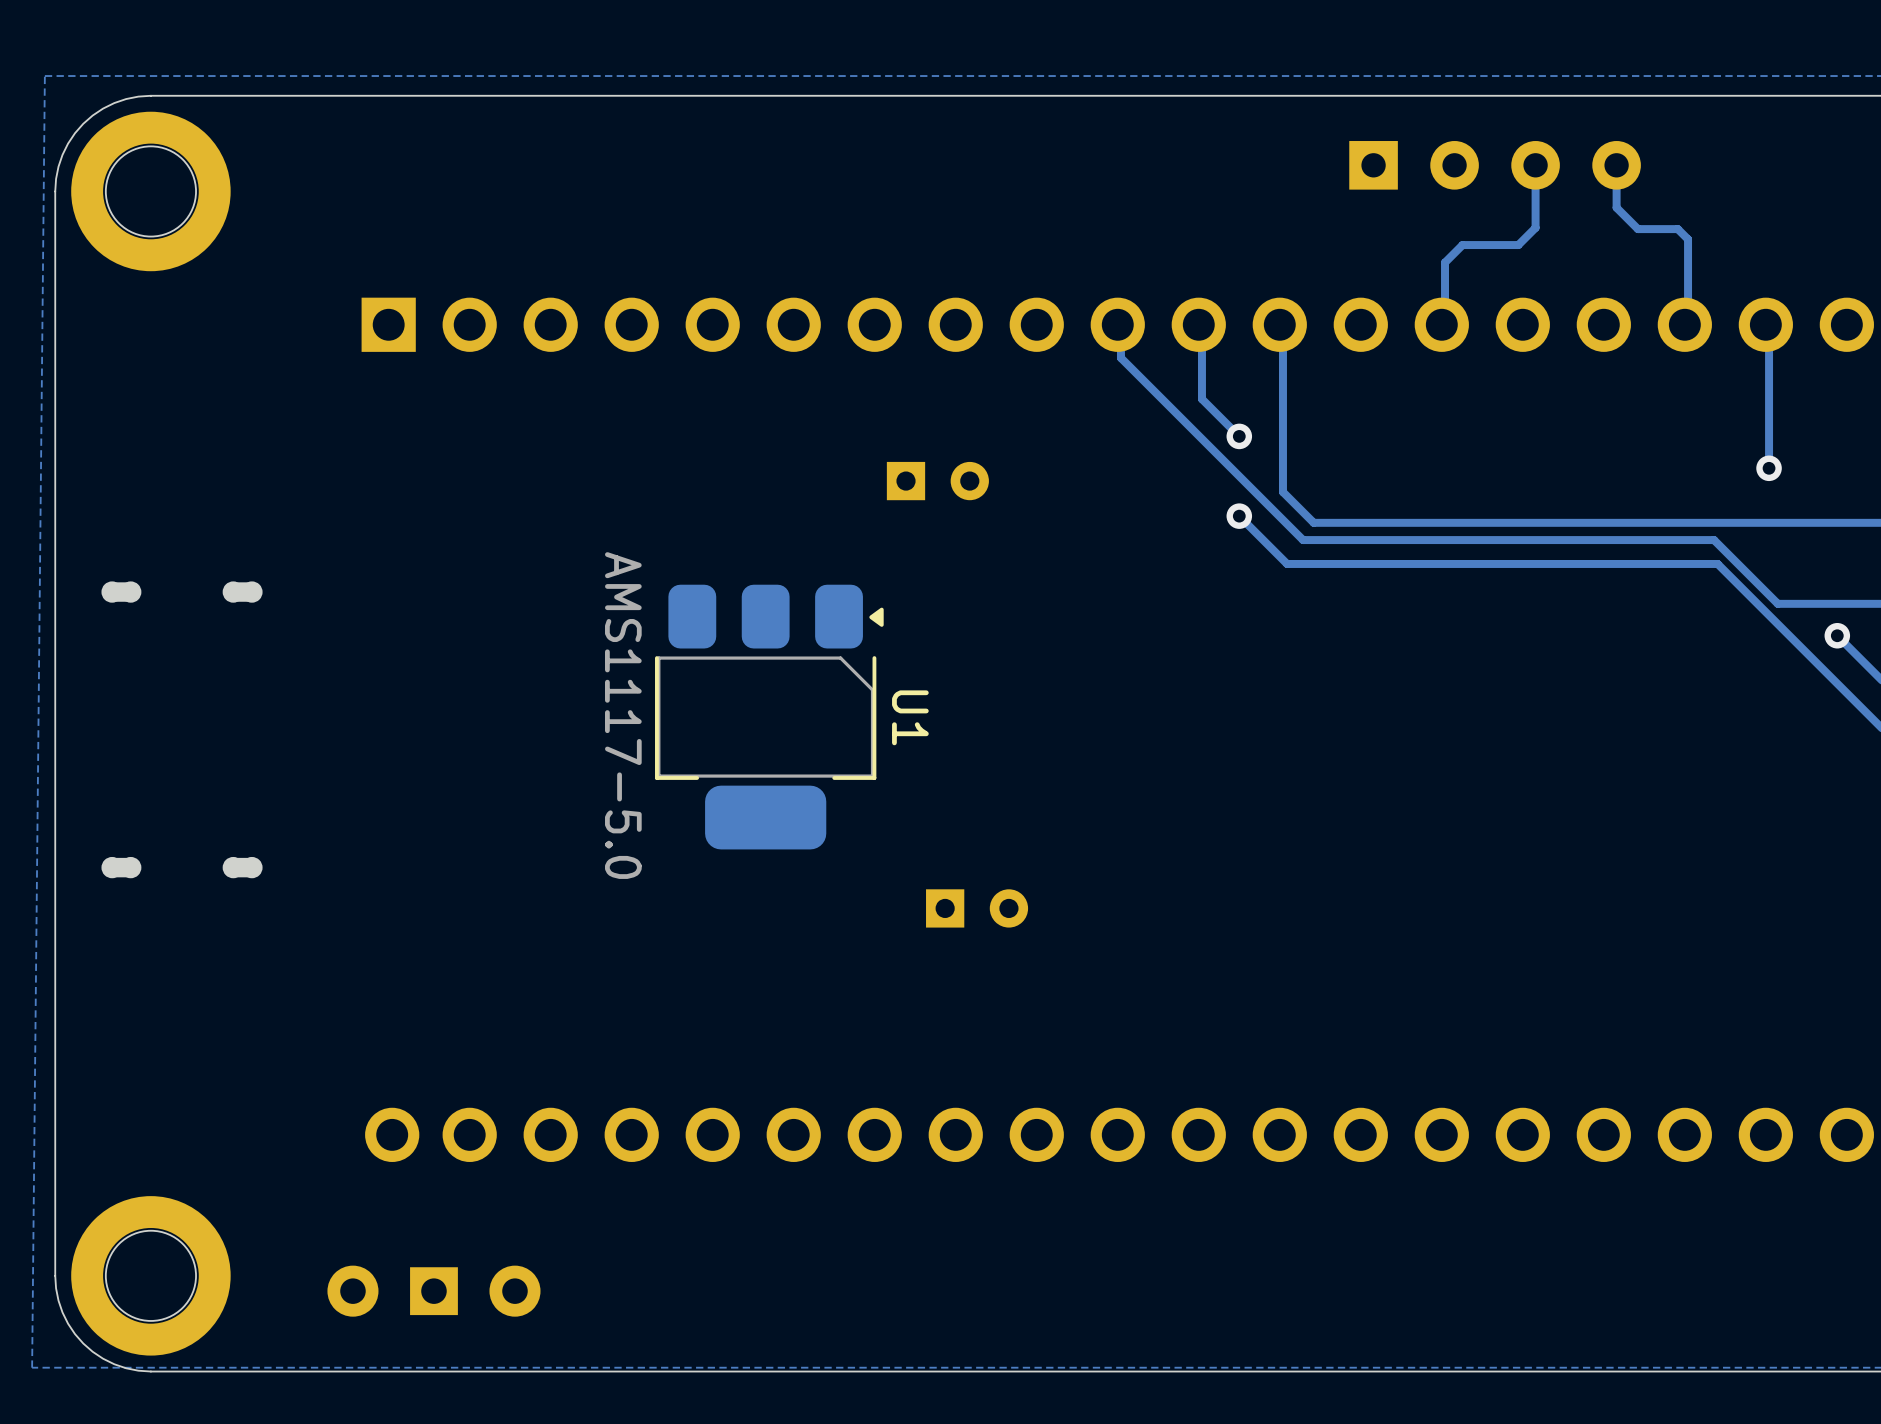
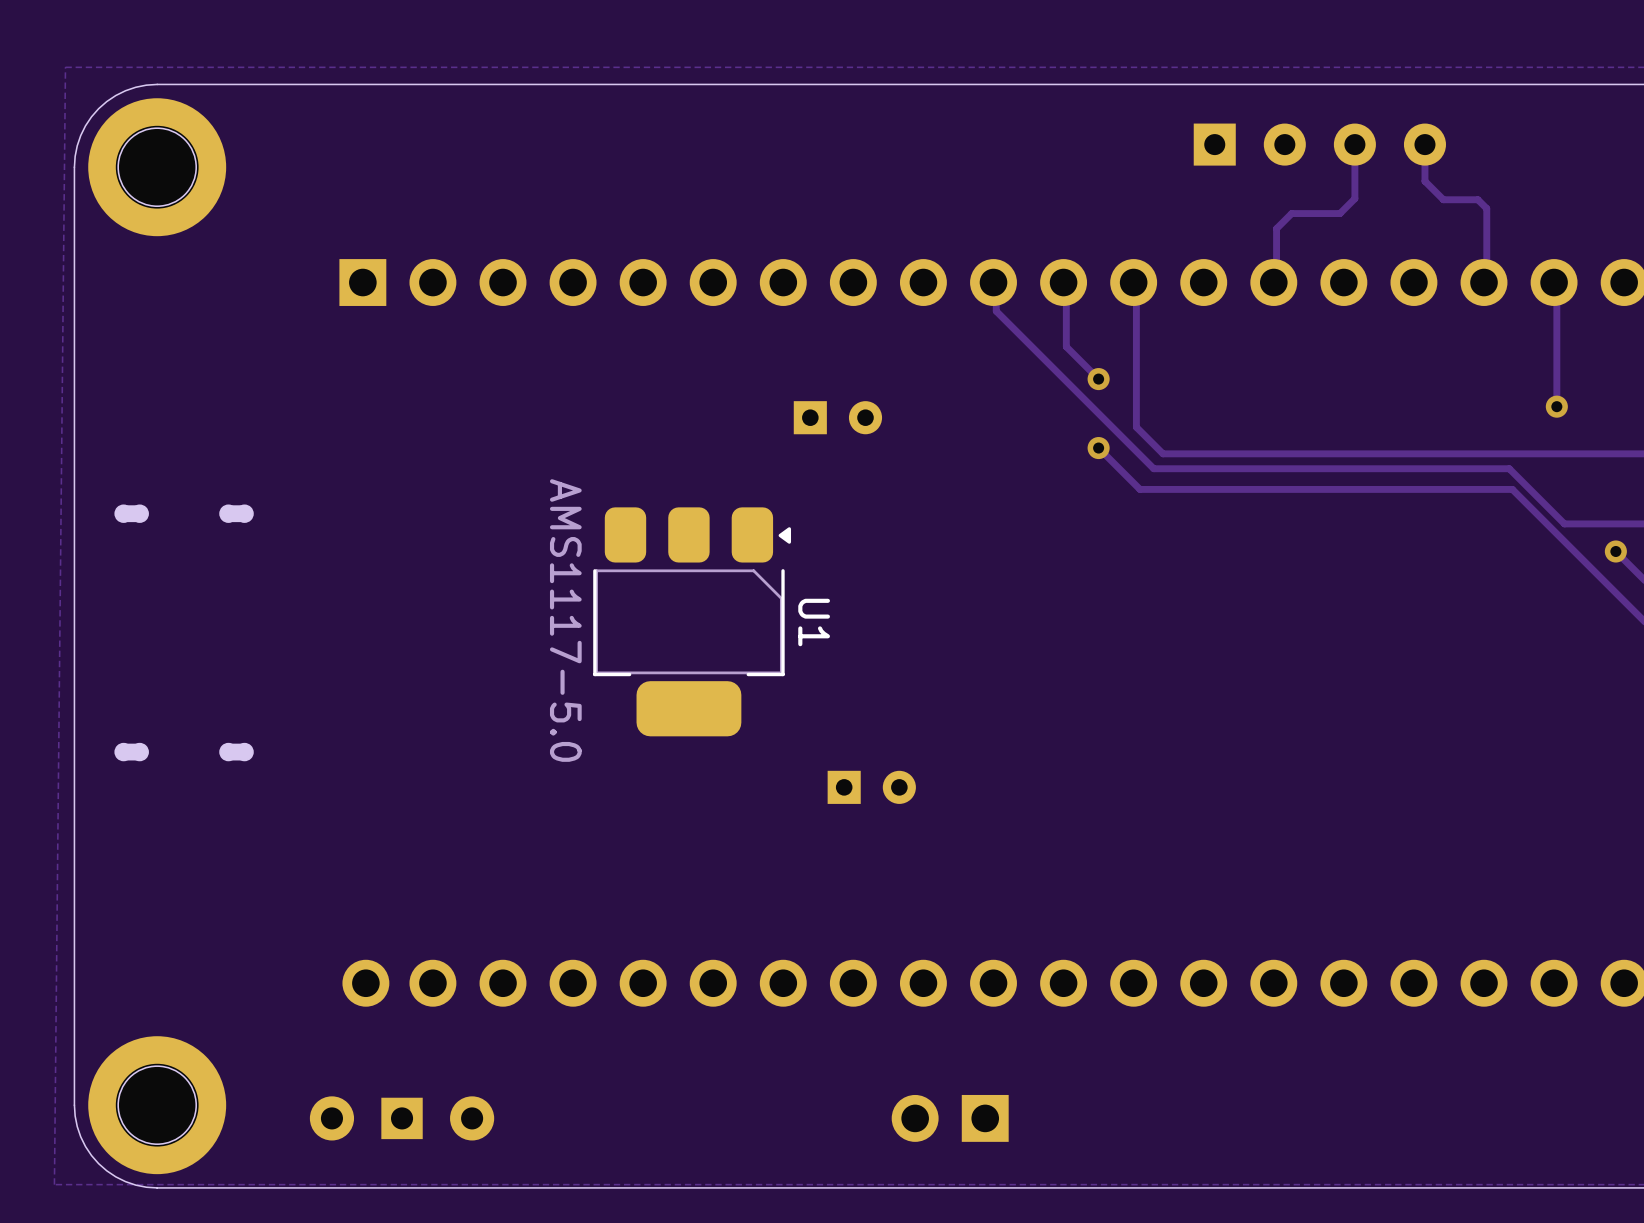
part: none -> (950, 1118)

